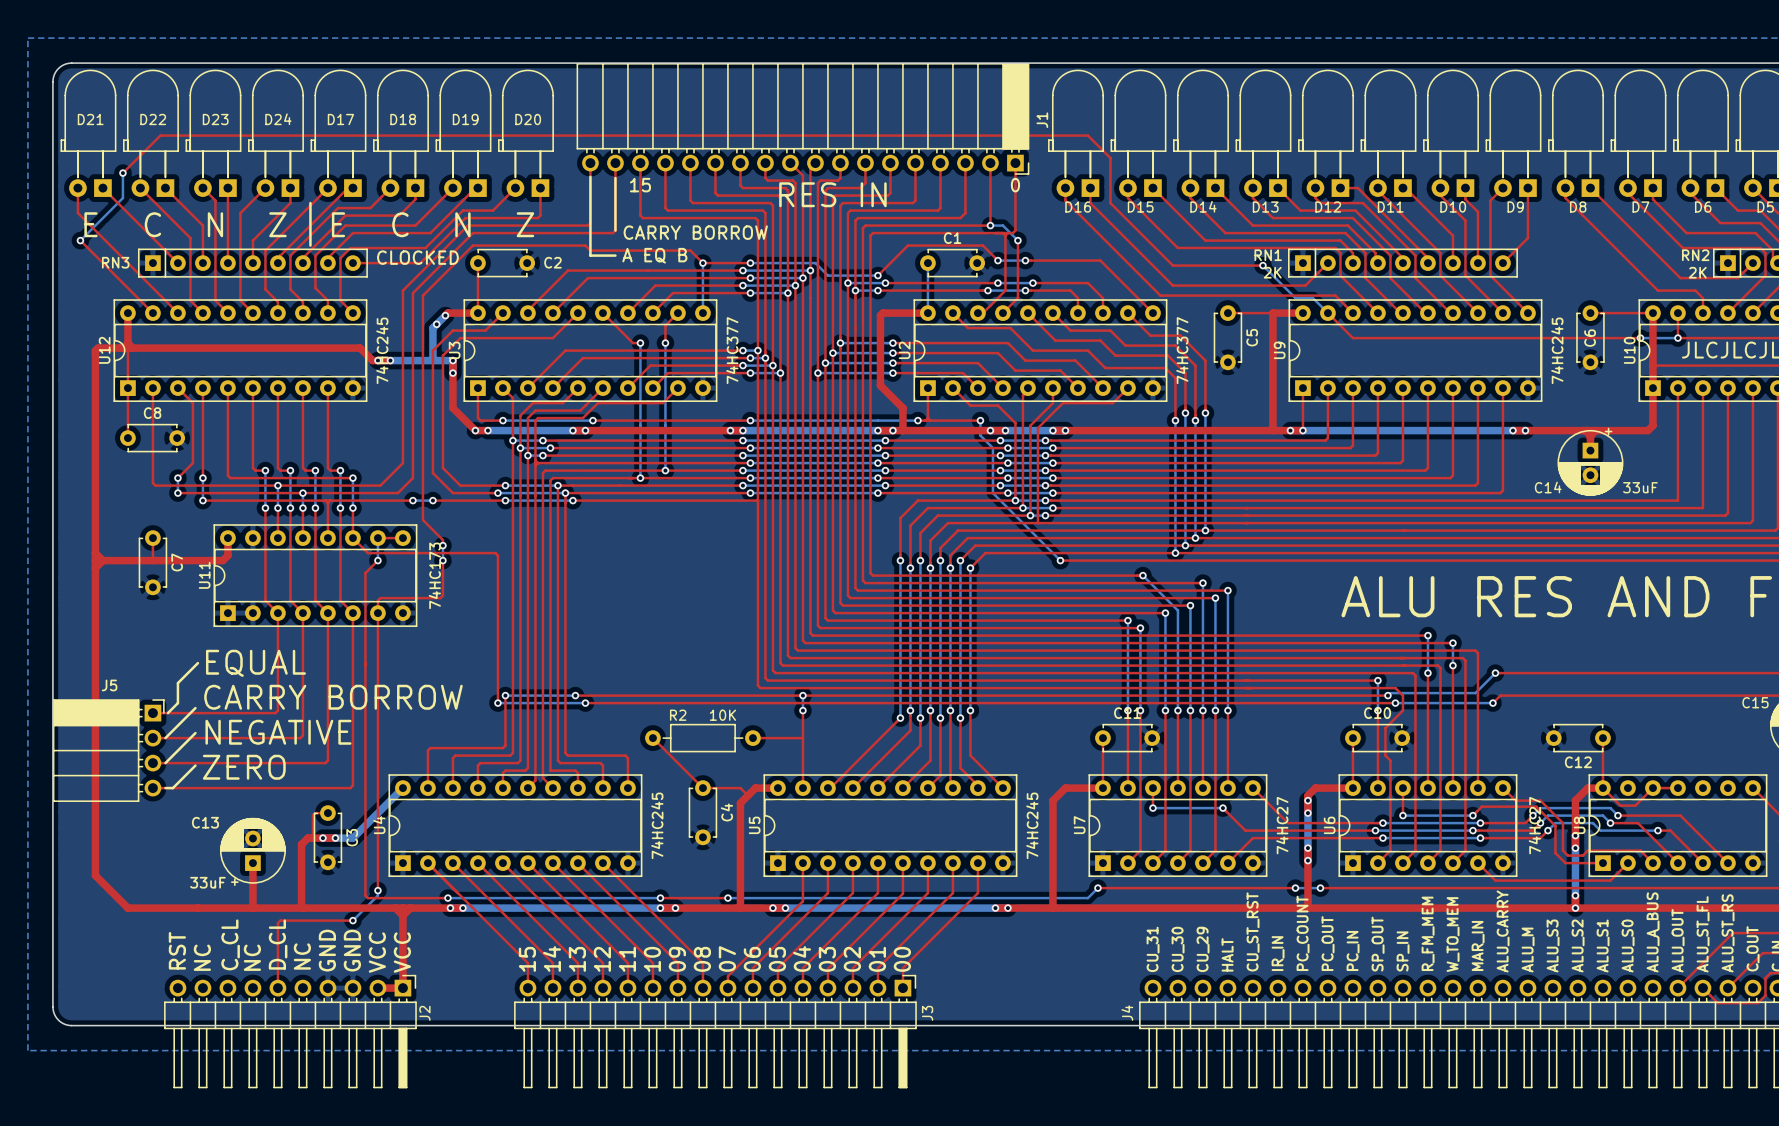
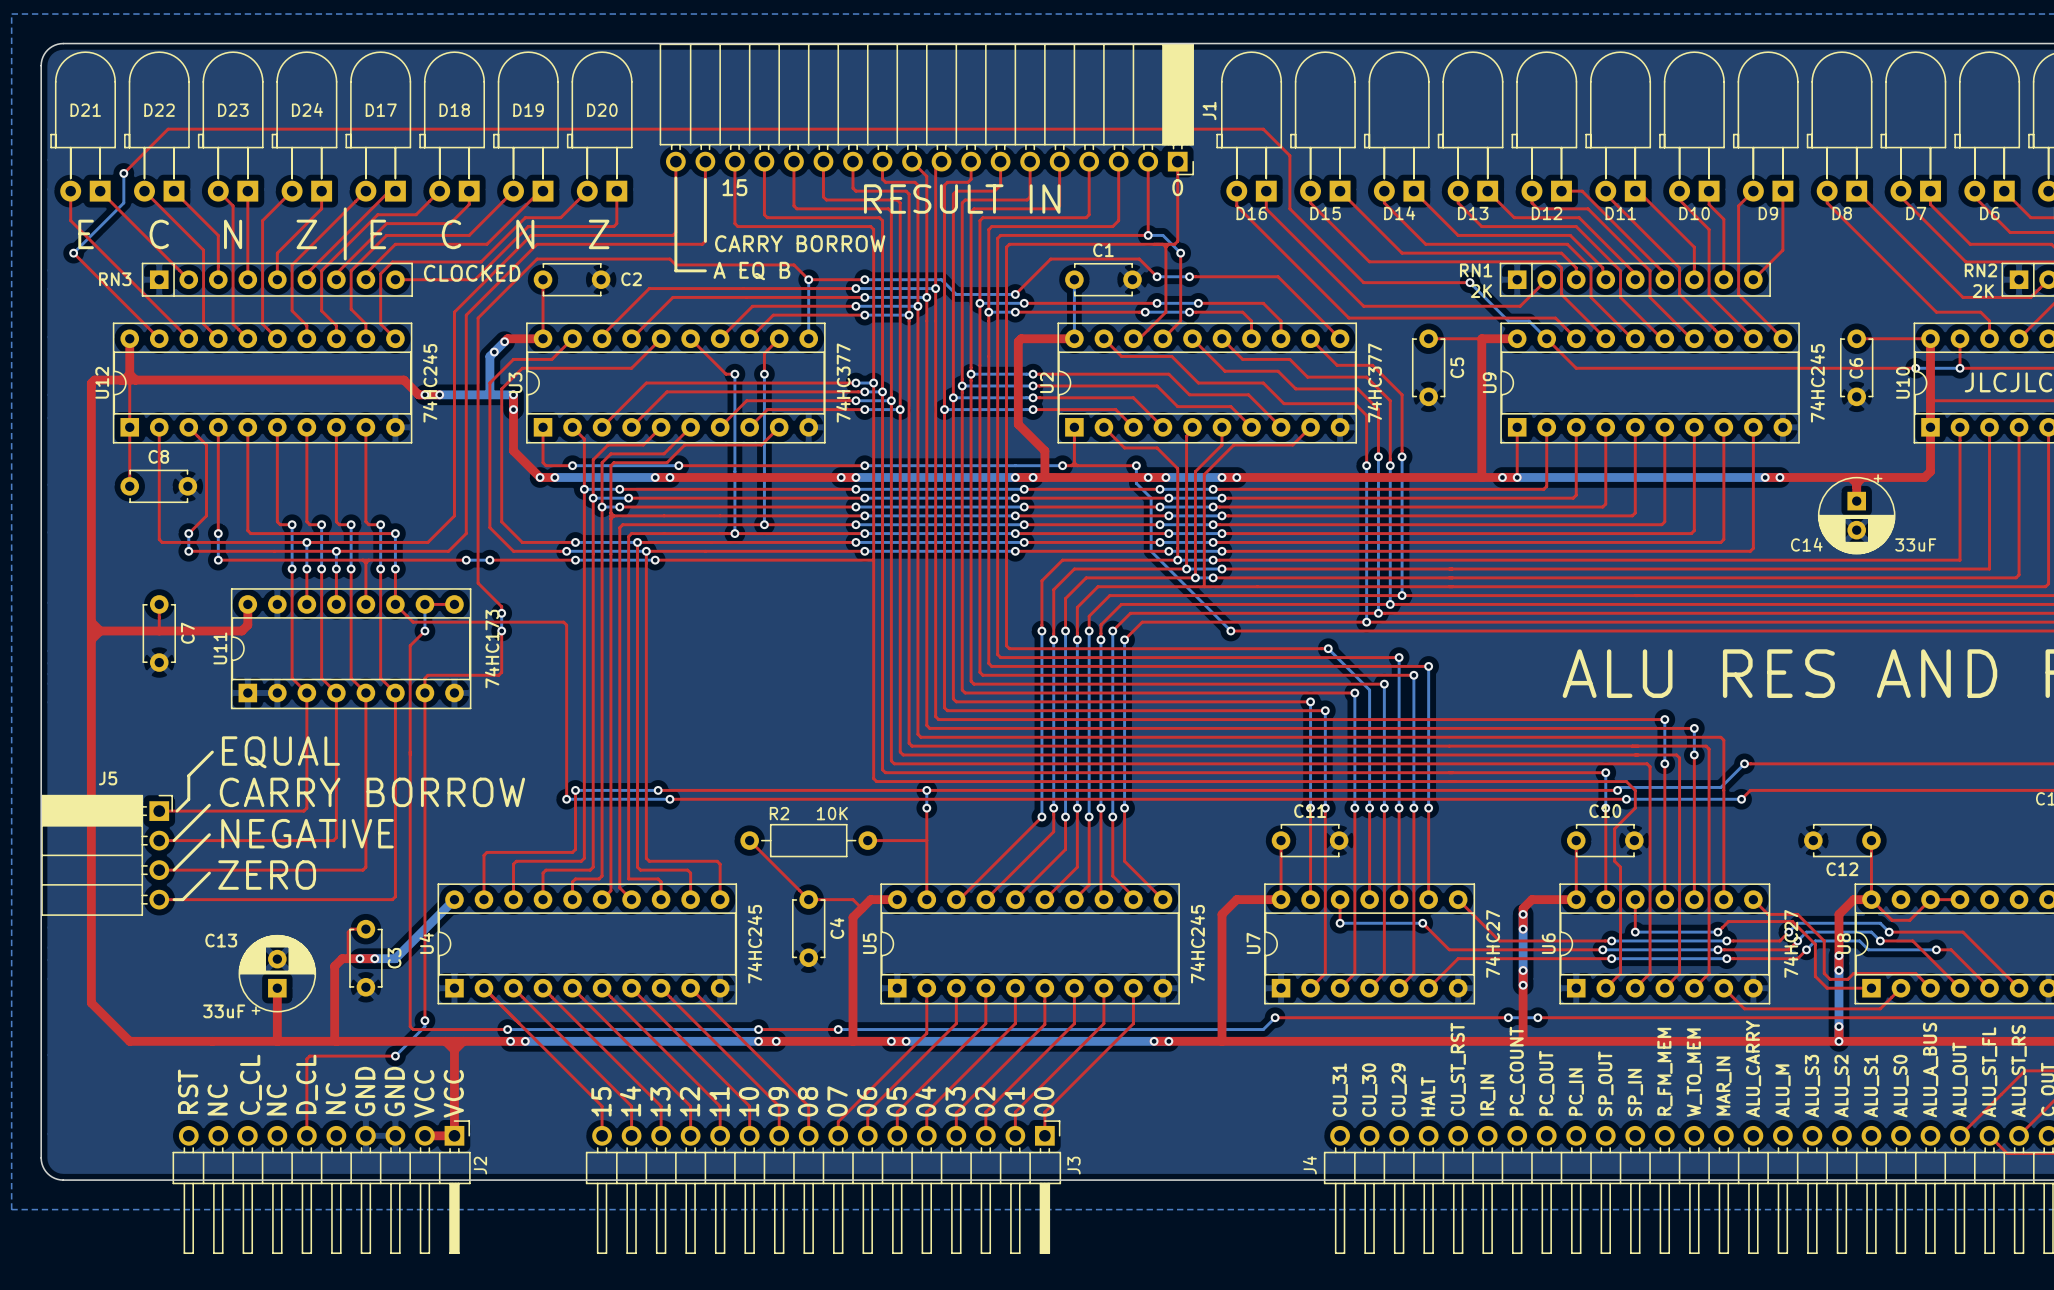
text: RES IN (832, 194) -> RESULT IN (962, 199)

